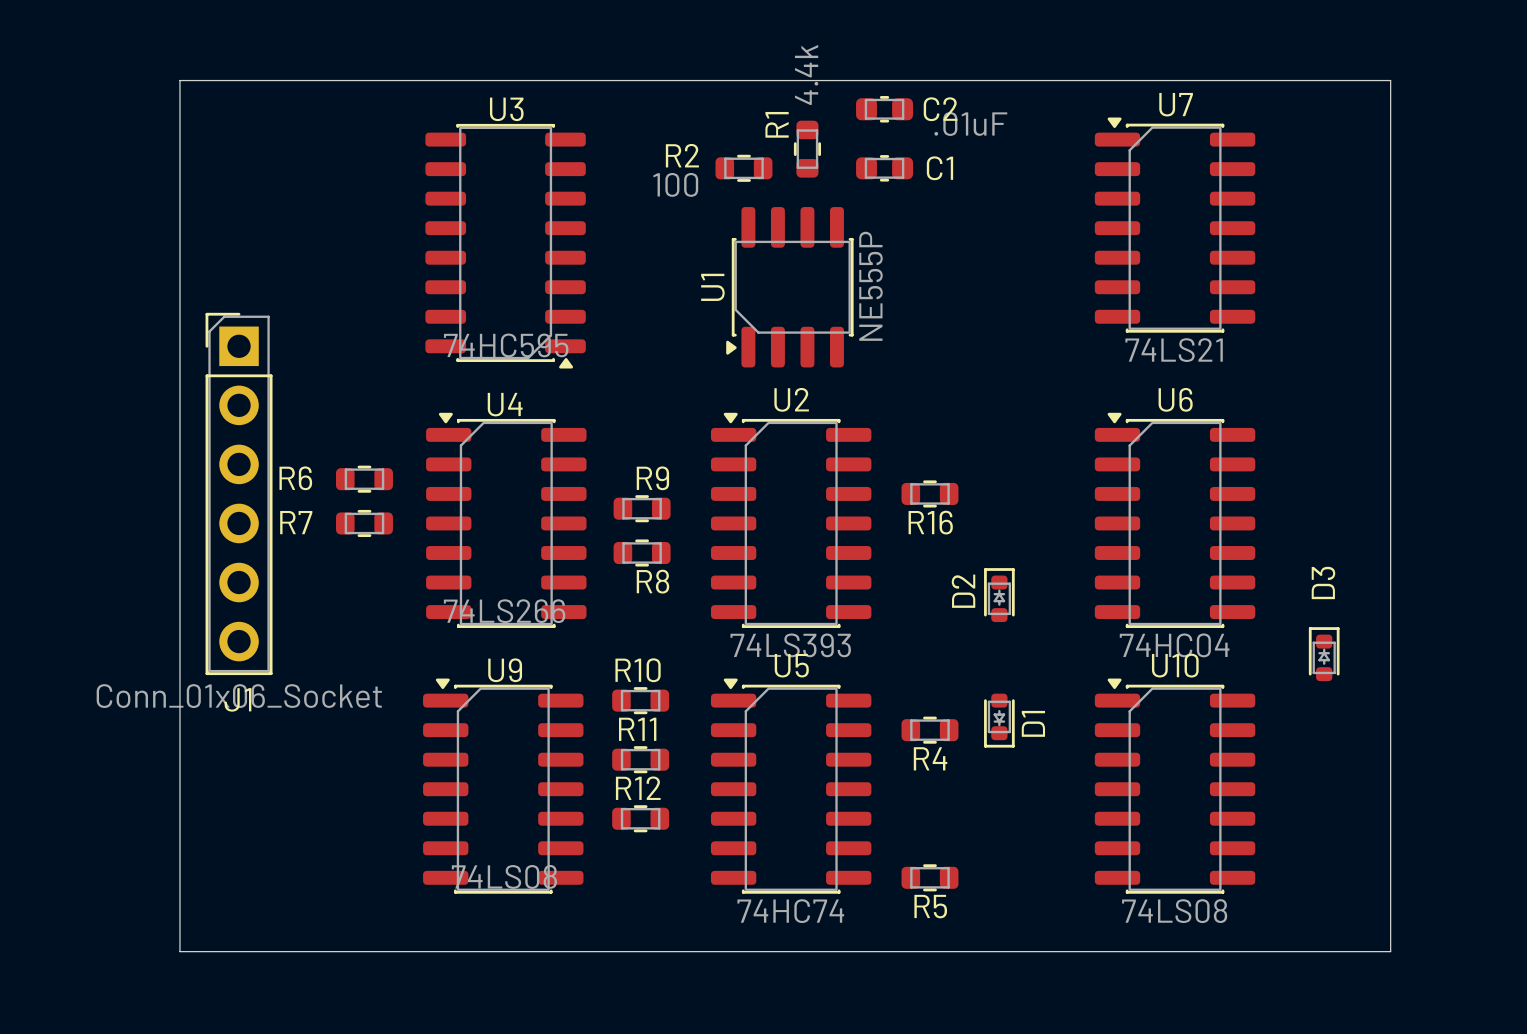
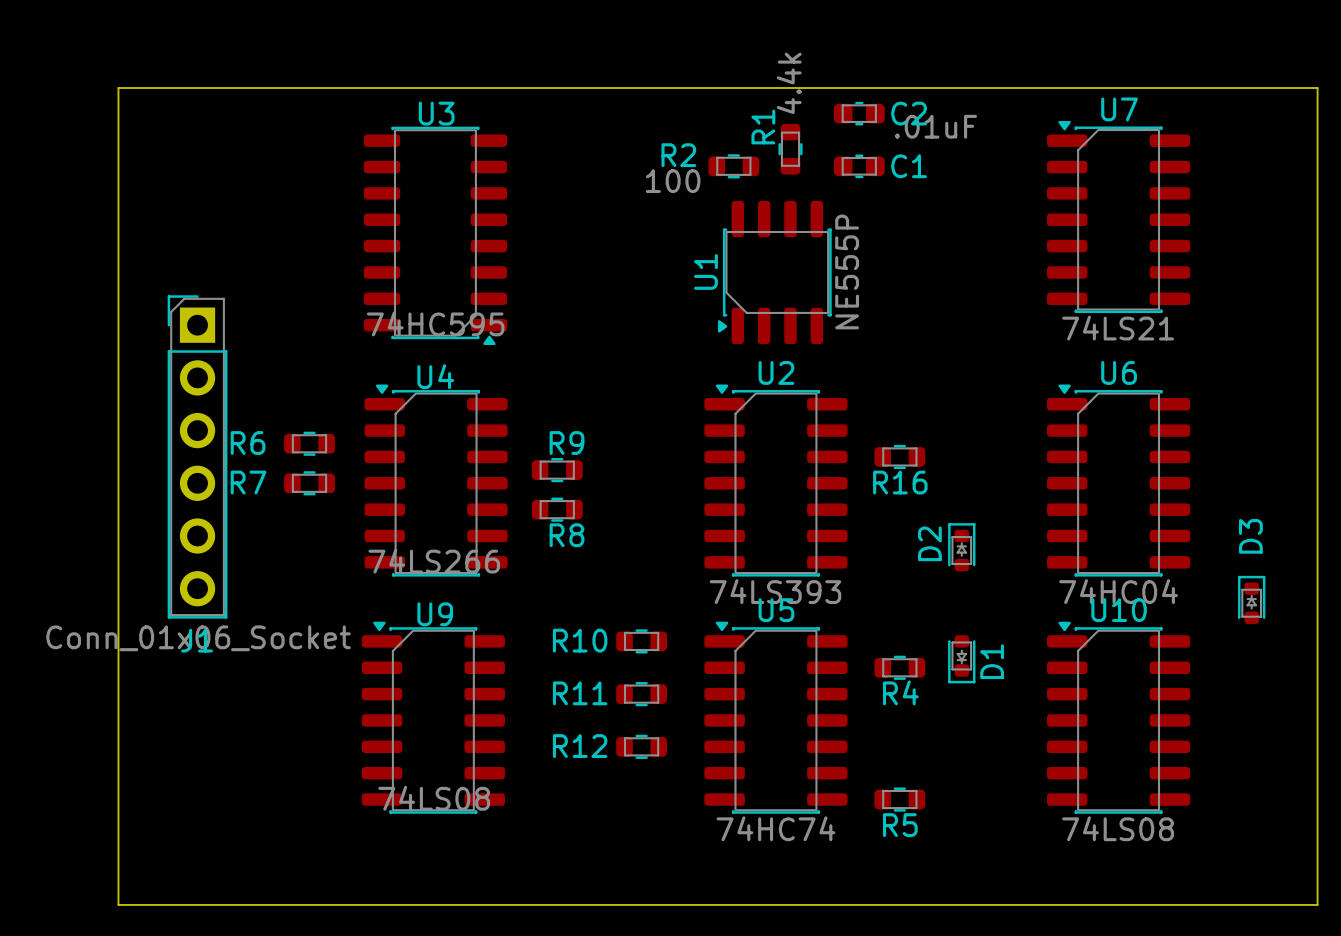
board edge: (179, 80) (179, 951) (1390, 951) (1390, 80) -> (144, 88) (118, 88) (118, 904) (1317, 904) (1317, 88) (1225, 88)
C2 position: (884, 109) -> (859, 113)
R1 position: (807, 149) -> (790, 149)
R2 position: (743, 168) -> (733, 166)
C1 position: (884, 168) -> (859, 166)
U7 position: (1175, 225) -> (1118, 217)
U1 position: (789, 287) -> (774, 272)
R16 position: (929, 493) -> (899, 456)
U2 position: (791, 520) -> (775, 480)
U6 position: (1175, 520) -> (1118, 480)
D2 position: (999, 595) -> (961, 547)
D3 position: (1324, 654) -> (1251, 599)
R10 name position: R10 (638, 670) -> R10 (580, 640)
R10 position: (640, 700) -> (641, 641)
D1 position: (999, 720) -> (961, 659)
R11 name position: R11 (637, 729) -> R11 (580, 693)
R4 position: (929, 730) -> (899, 667)
R11 position: (640, 759) -> (641, 694)
U5 position: (791, 786) -> (775, 717)
U10 position: (1175, 786) -> (1118, 717)
R12 name position: R12 (638, 788) -> R12 (580, 746)
R12 position: (640, 818) -> (641, 746)
R5 position: (929, 877) -> (899, 799)

